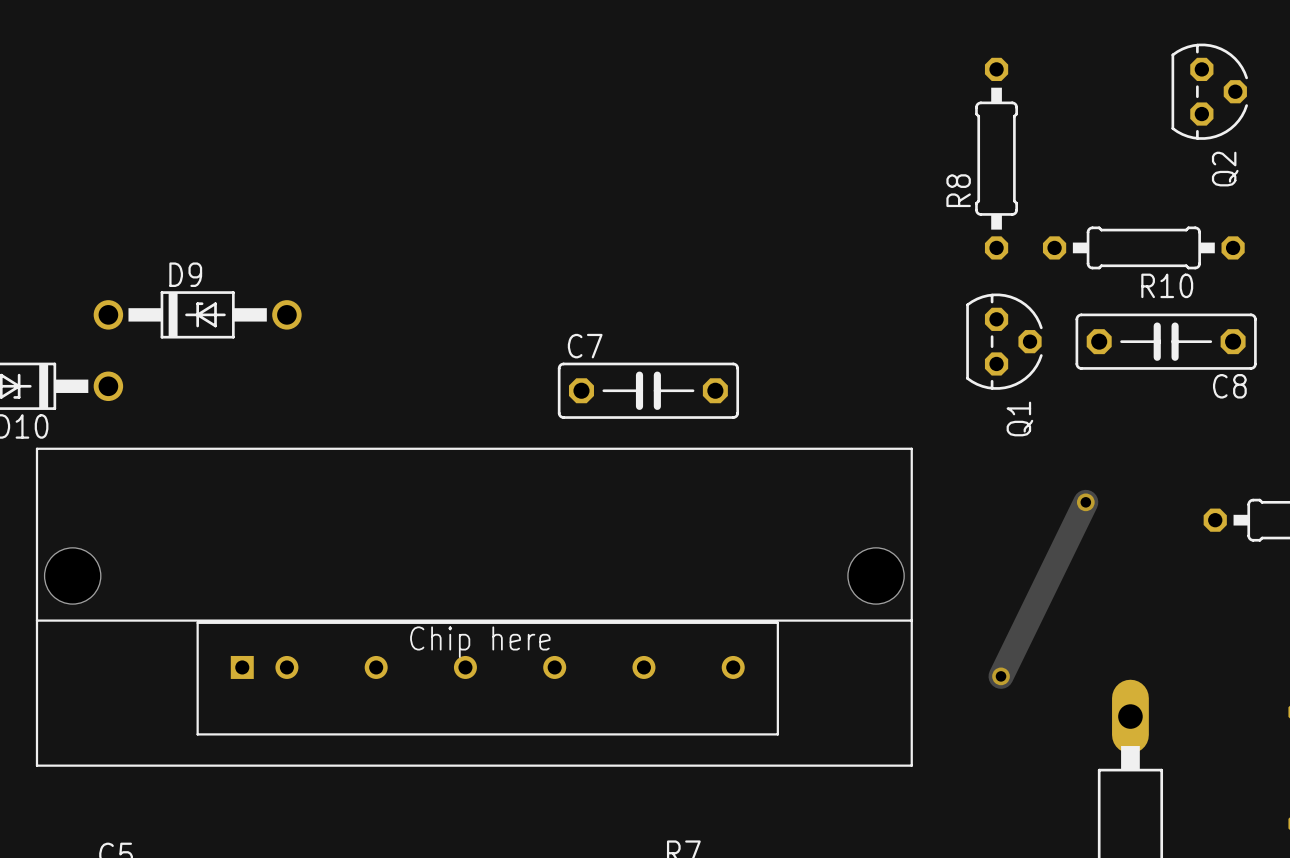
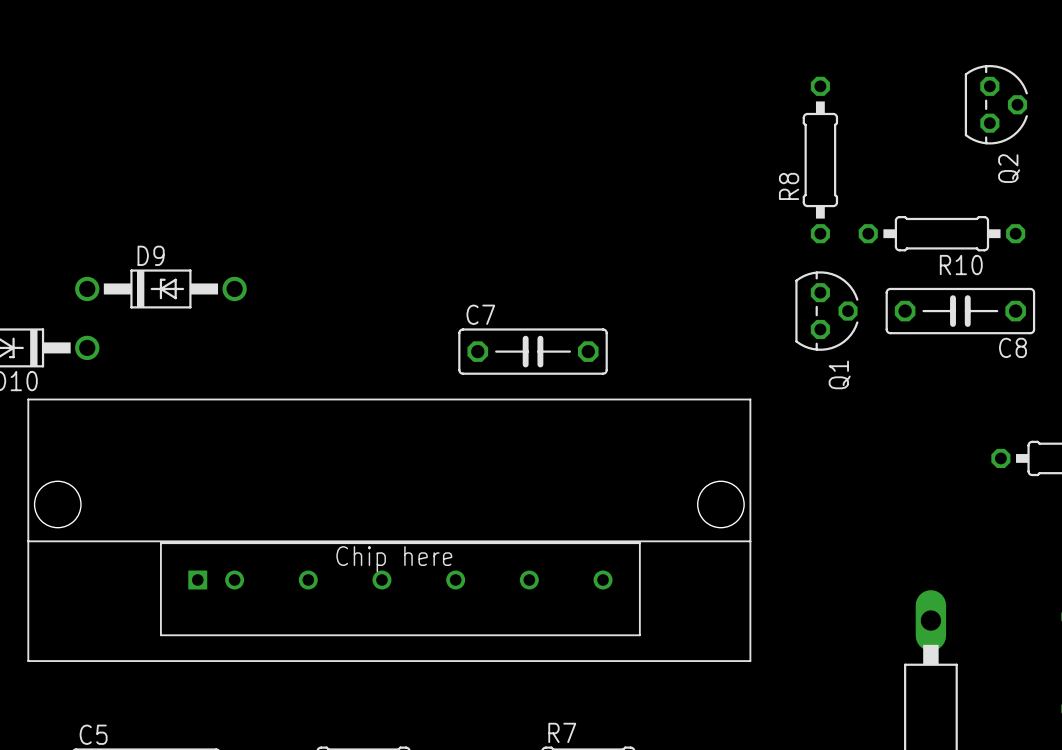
track: (1085, 502) (1001, 676) -> none
via: (1085, 502) -> none
via: (1001, 676) -> none

